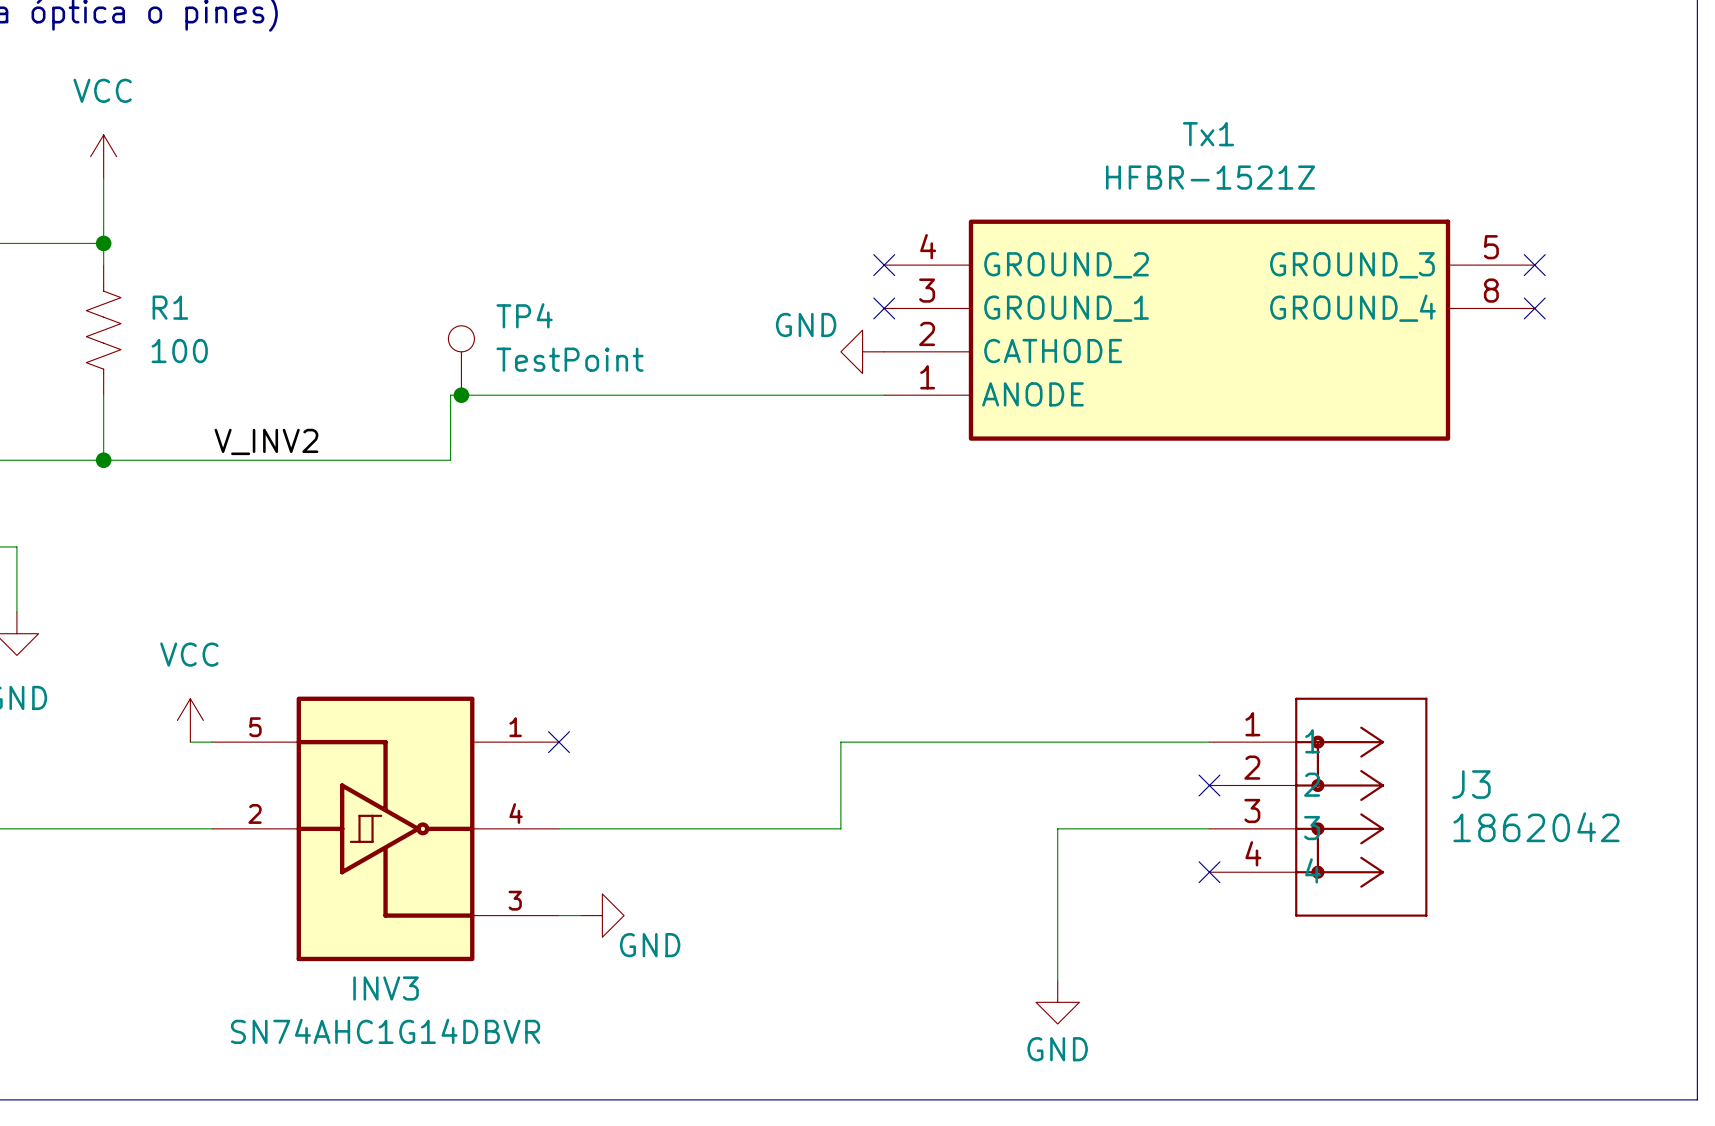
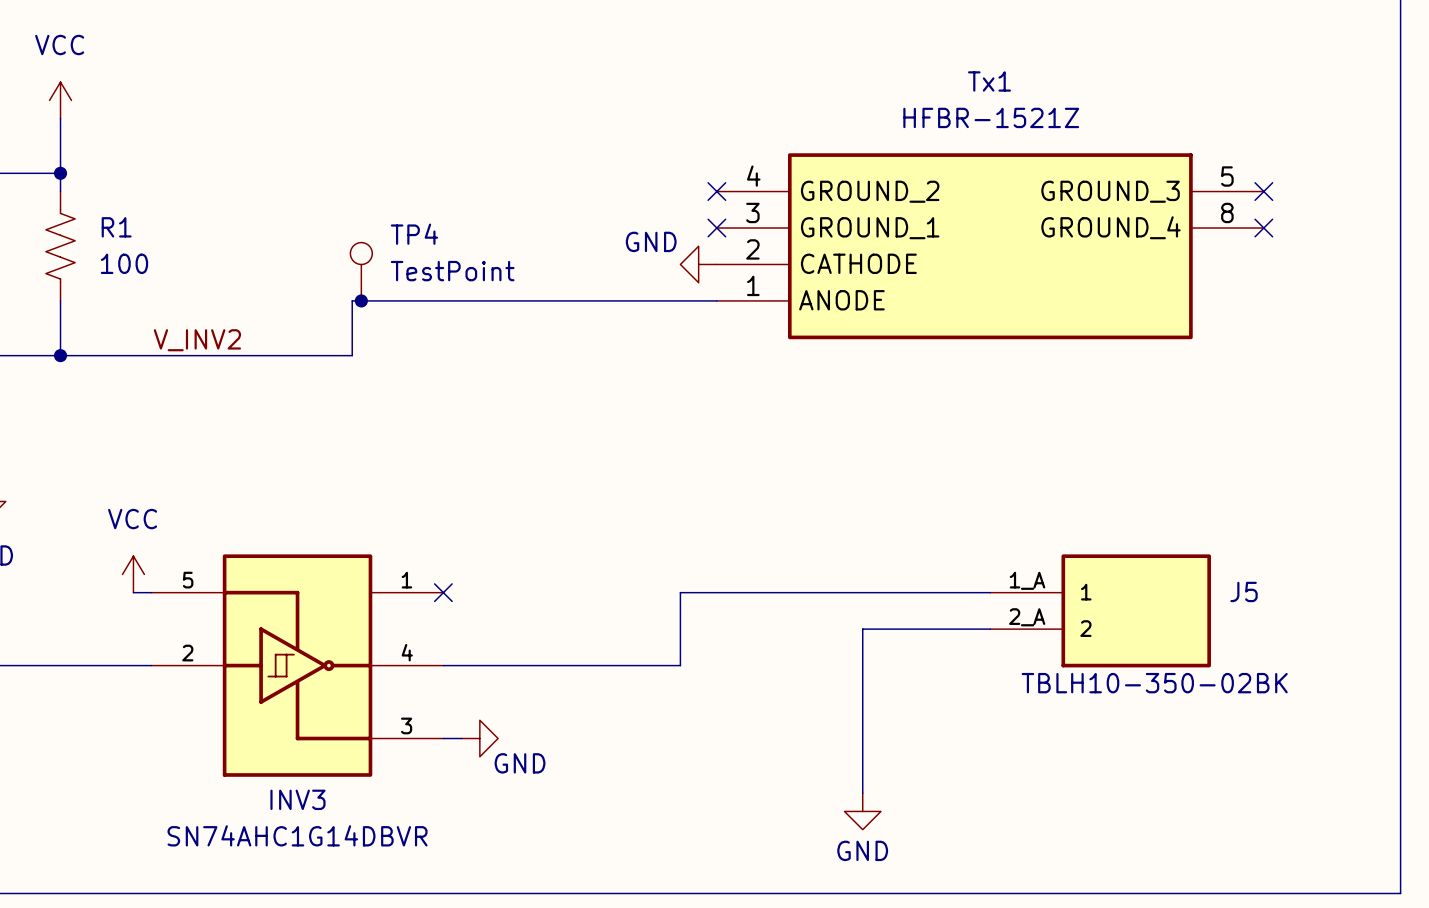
J5: none -> TBLH10-350-02BK (1100, 610)
no-connect mark: (1209, 785) -> none
J3: 1862042 (1318, 807) -> none
wire: (1057, 828) (1209, 828) -> (862, 665) (862, 629) (990, 629)
no-connect mark: (1209, 872) -> none

